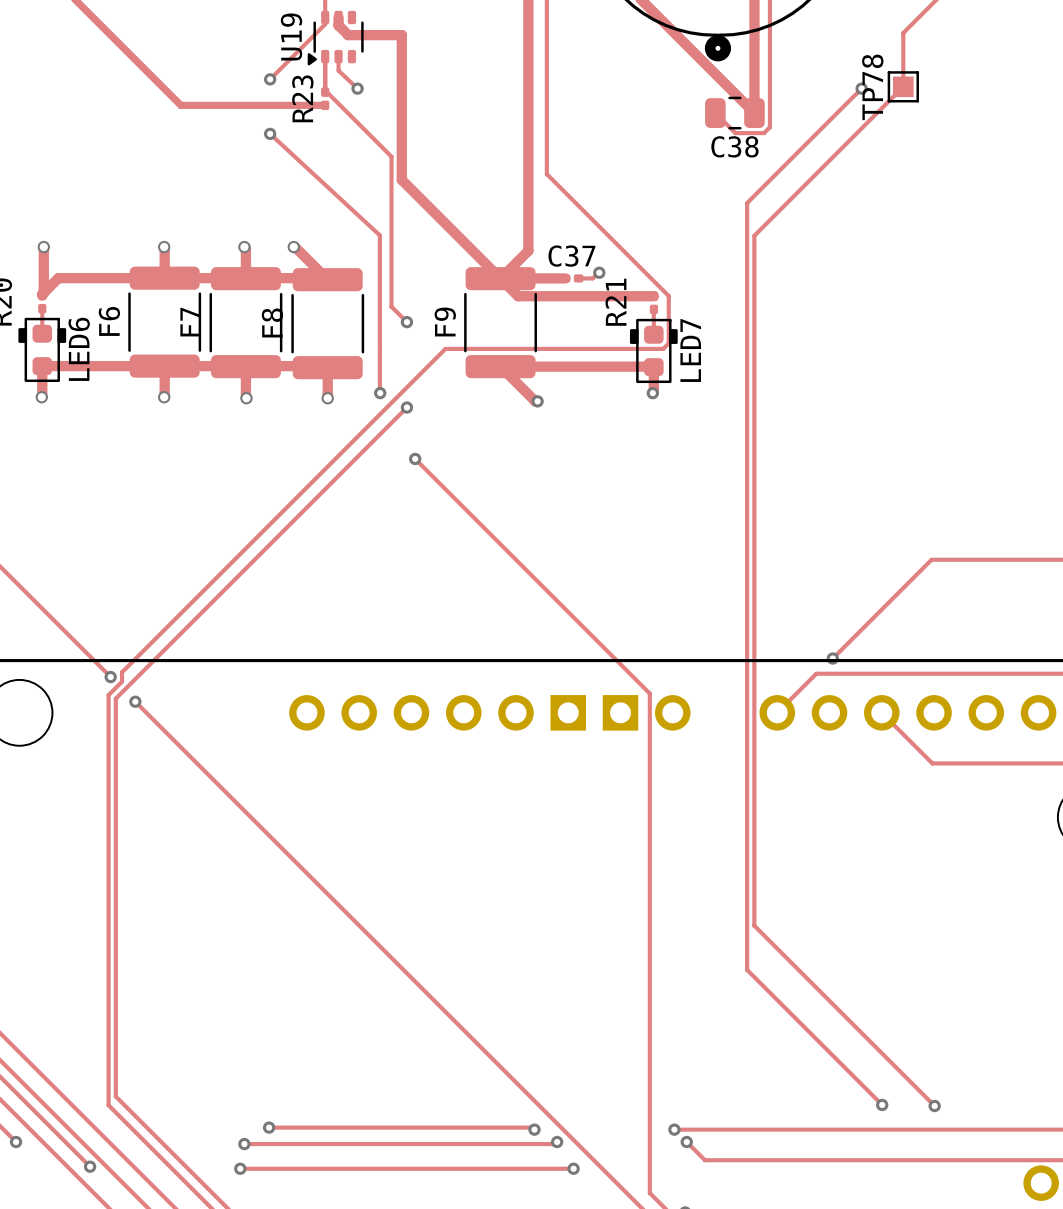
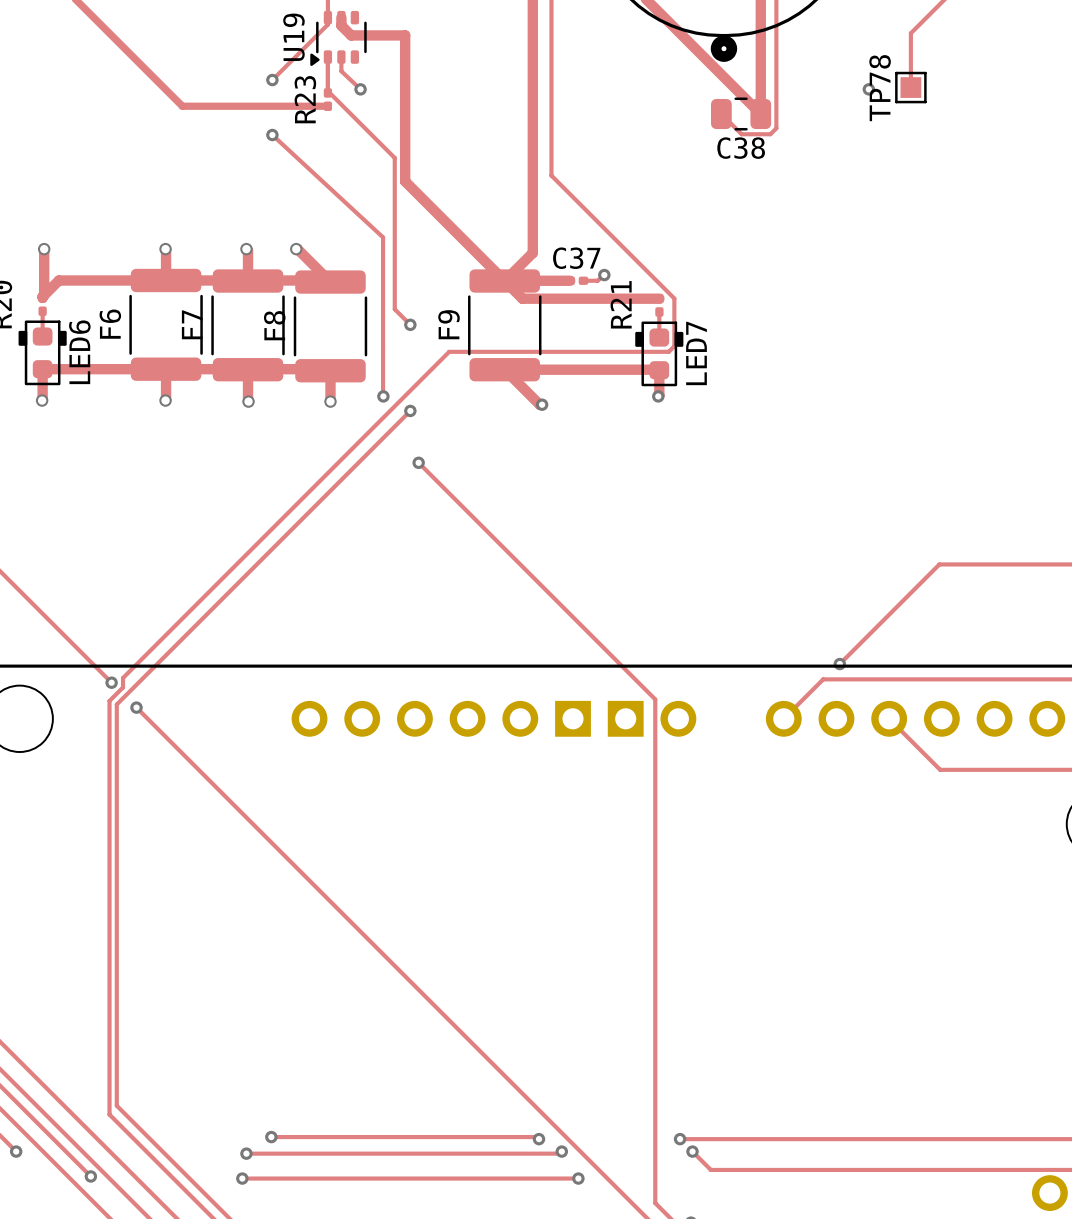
track: (903, 86) (754, 235) (754, 925) (934, 1106) -> none
track: (861, 88) (747, 203) (747, 969) (882, 1104) -> none
via: (882, 1104) -> none
via: (934, 1106) -> none

